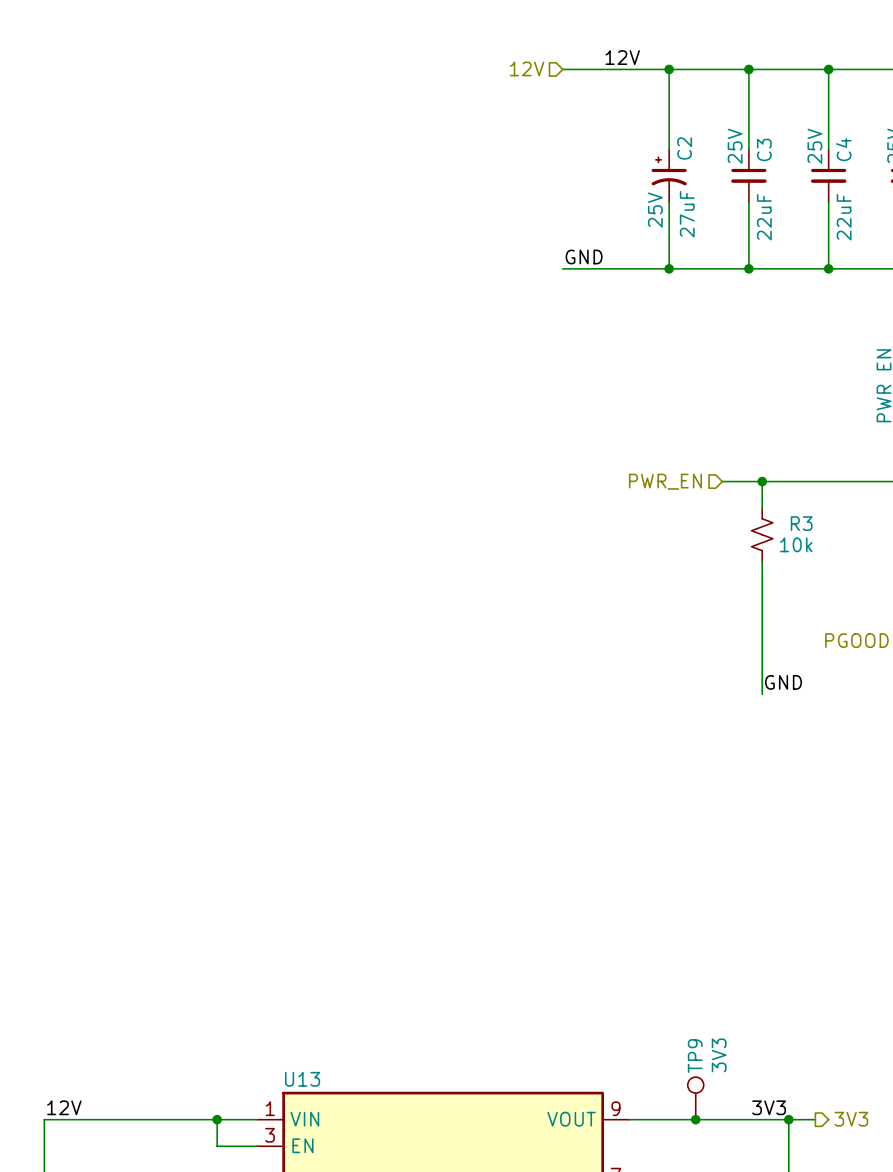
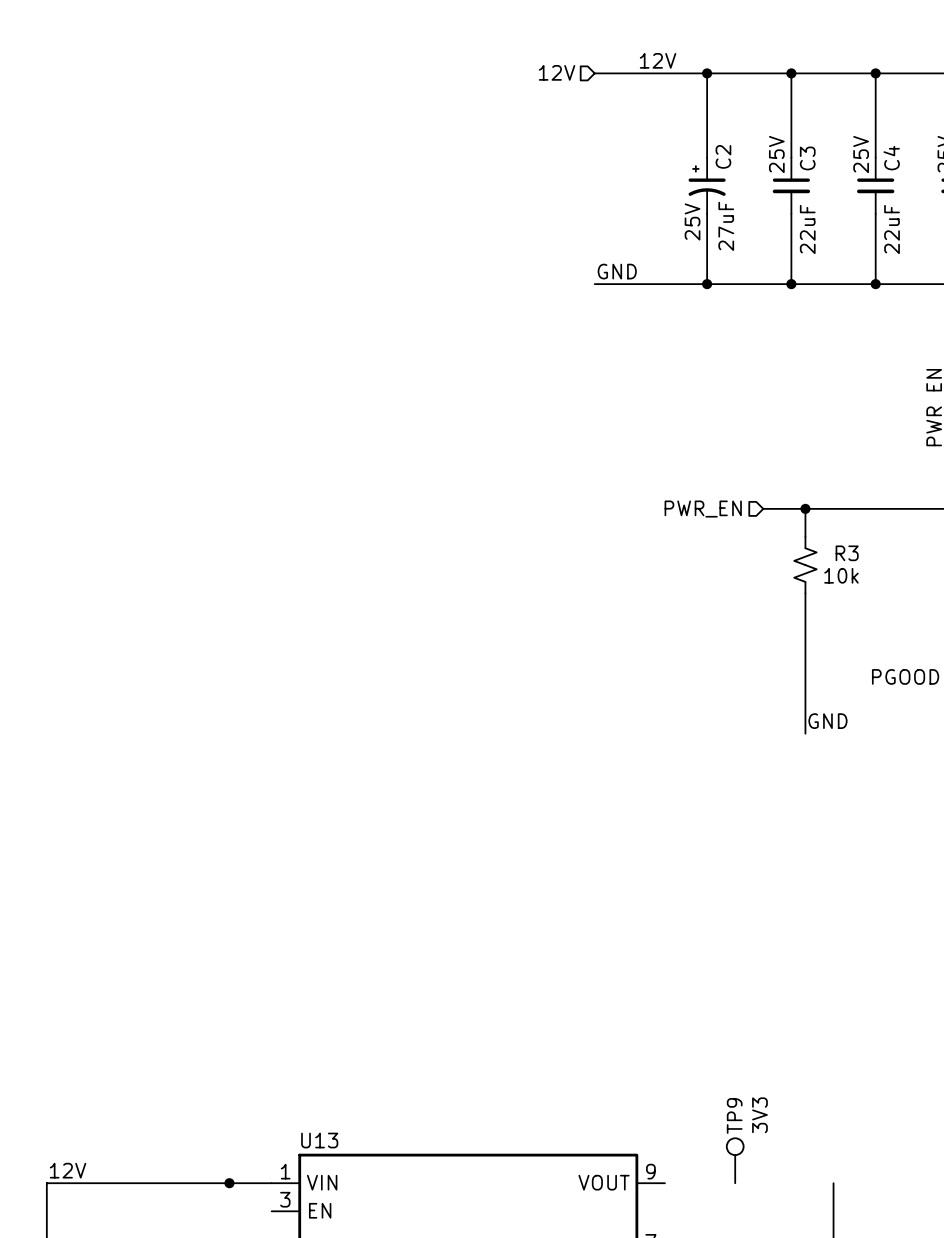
label: 3V3 (769, 1107) -> none
wire: (217, 1119) (217, 1146) (257, 1146) -> none
wire: (629, 1119) (815, 1119) -> none
junction: (695, 1119) -> none
junction: (788, 1119) -> none
hierarchical label: 3V3 (851, 1119) -> none

